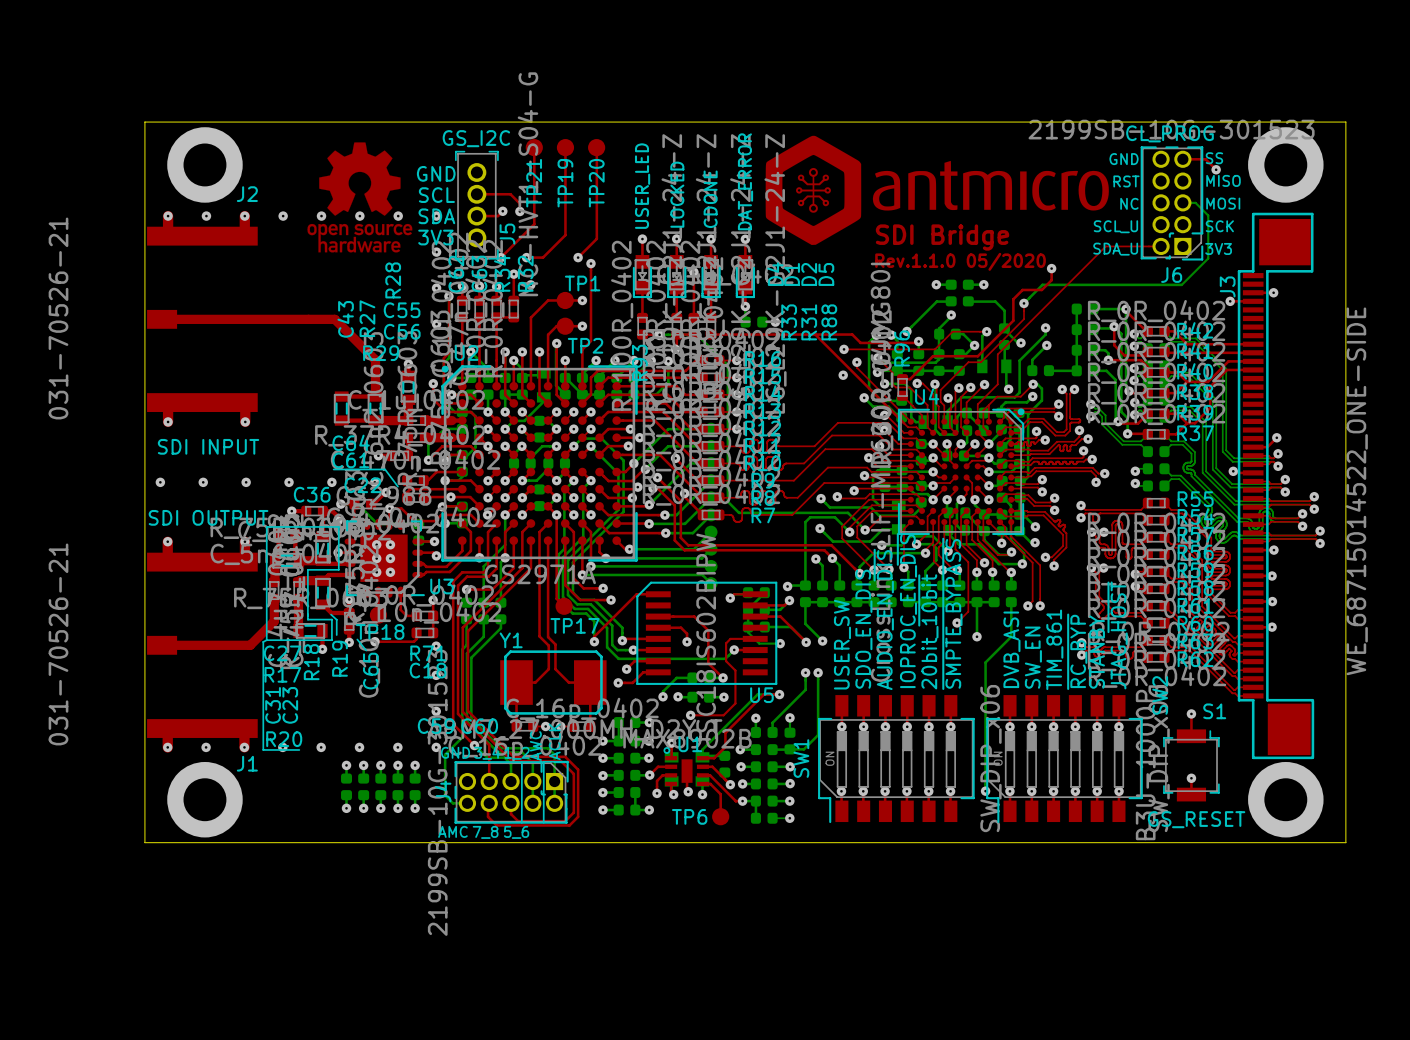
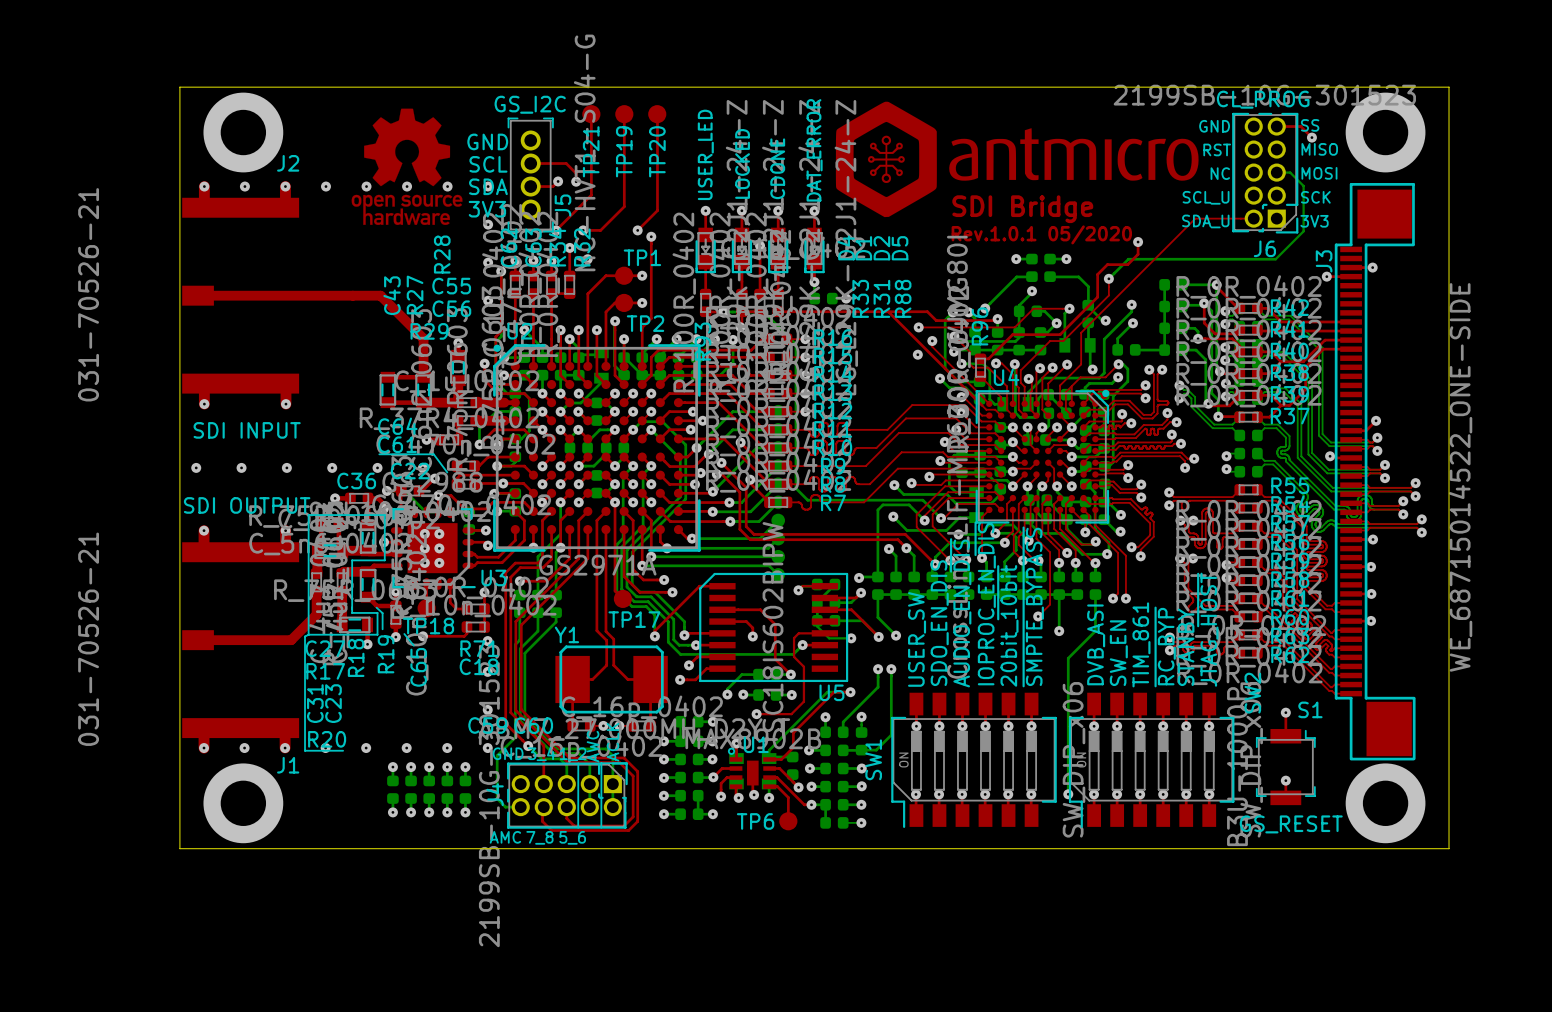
text: Rev.1.1.0 05/2020 (960, 261) -> Rev.1.0.1 05/2020 (1041, 234)

